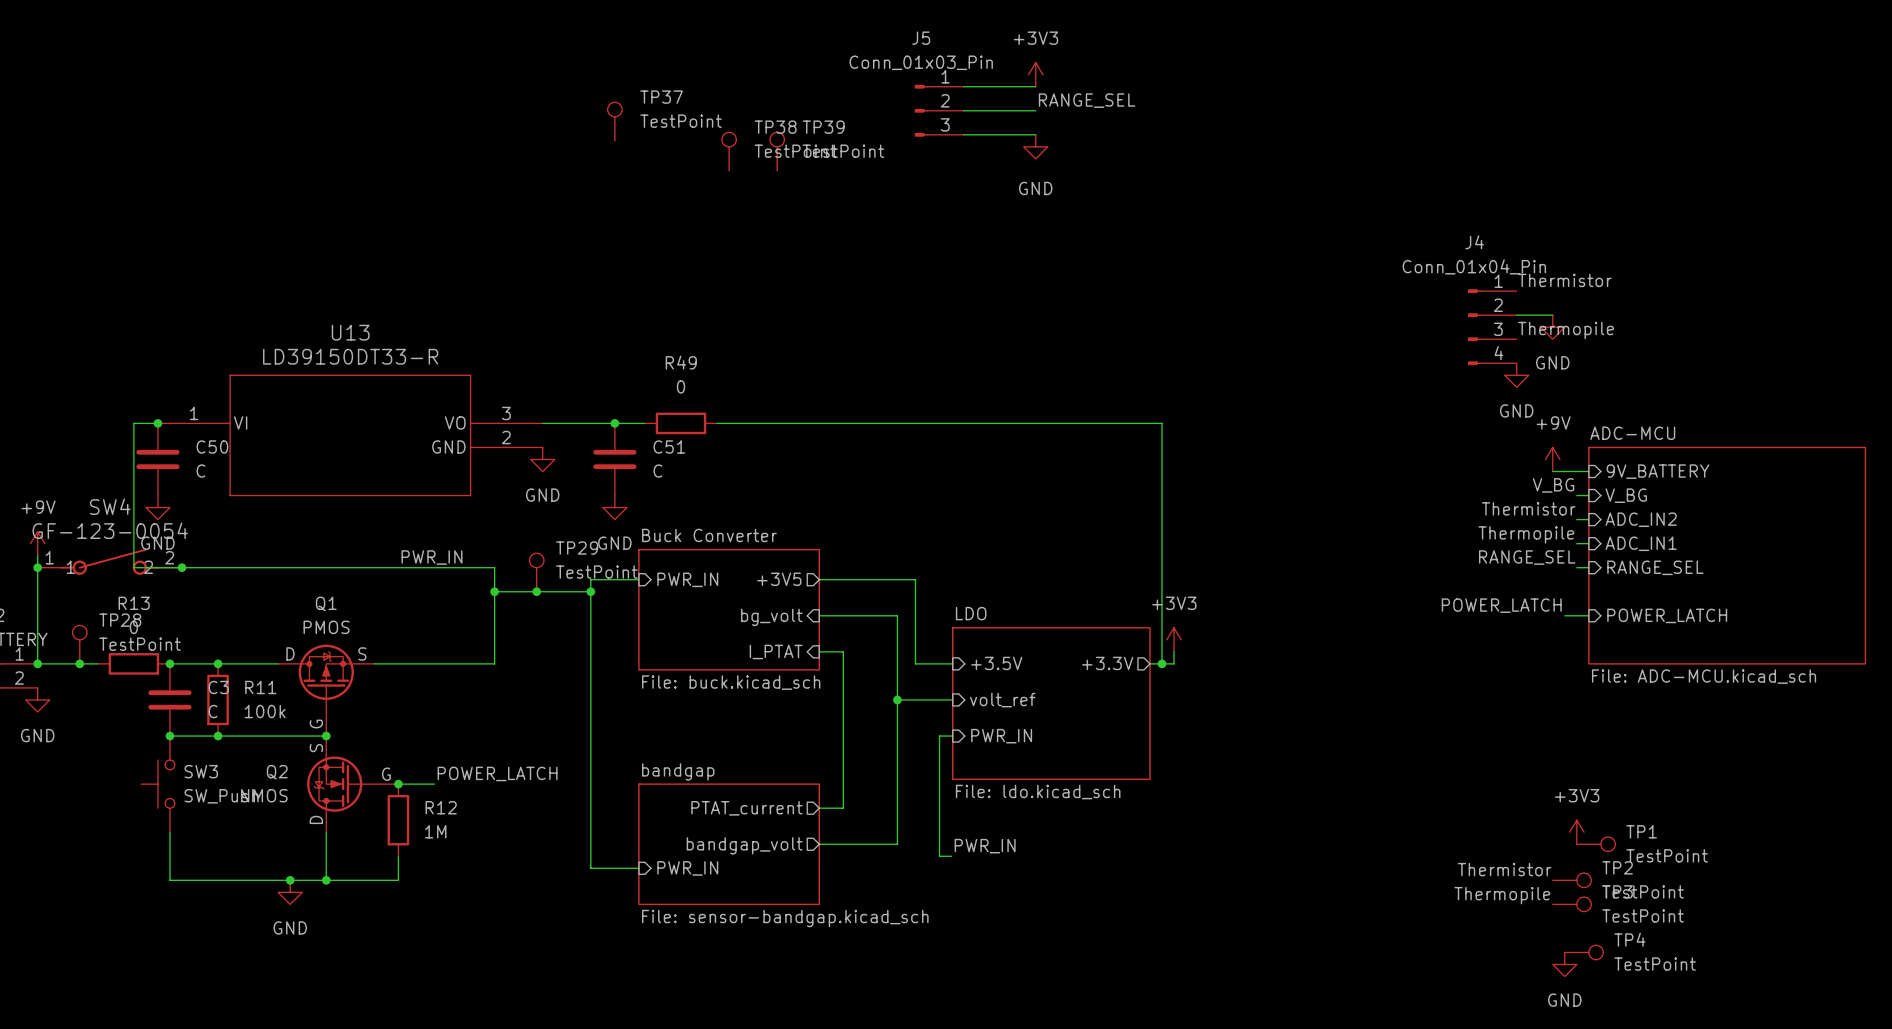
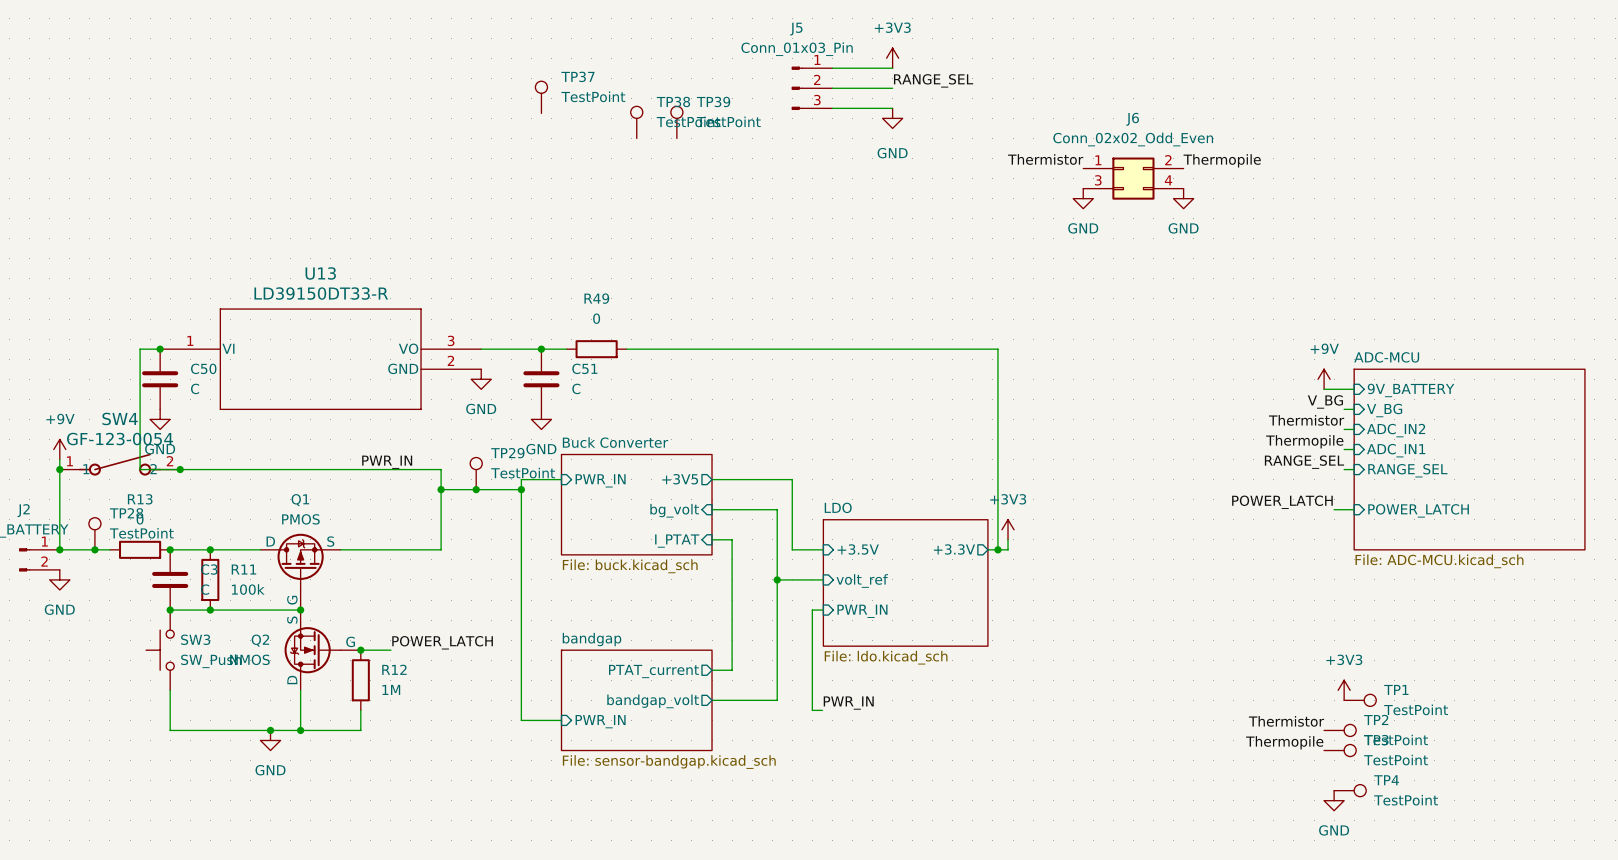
label: none -> Thermistor (1045, 159)
J6: none -> Conn_02x02_Odd_Even (1133, 178)
power symbol: none -> GND (1083, 198)
power symbol: none -> GND (1183, 198)
label: Thermistor (1564, 280) -> none
wire: (1516, 315) (1552, 315) -> none
J4: Conn_01x04_Pin (1492, 327) -> none
power symbol: GND (1552, 327) -> none
label position: Thermopile (1566, 330) -> Thermopile (1222, 160)
power symbol: GND (1516, 375) -> none

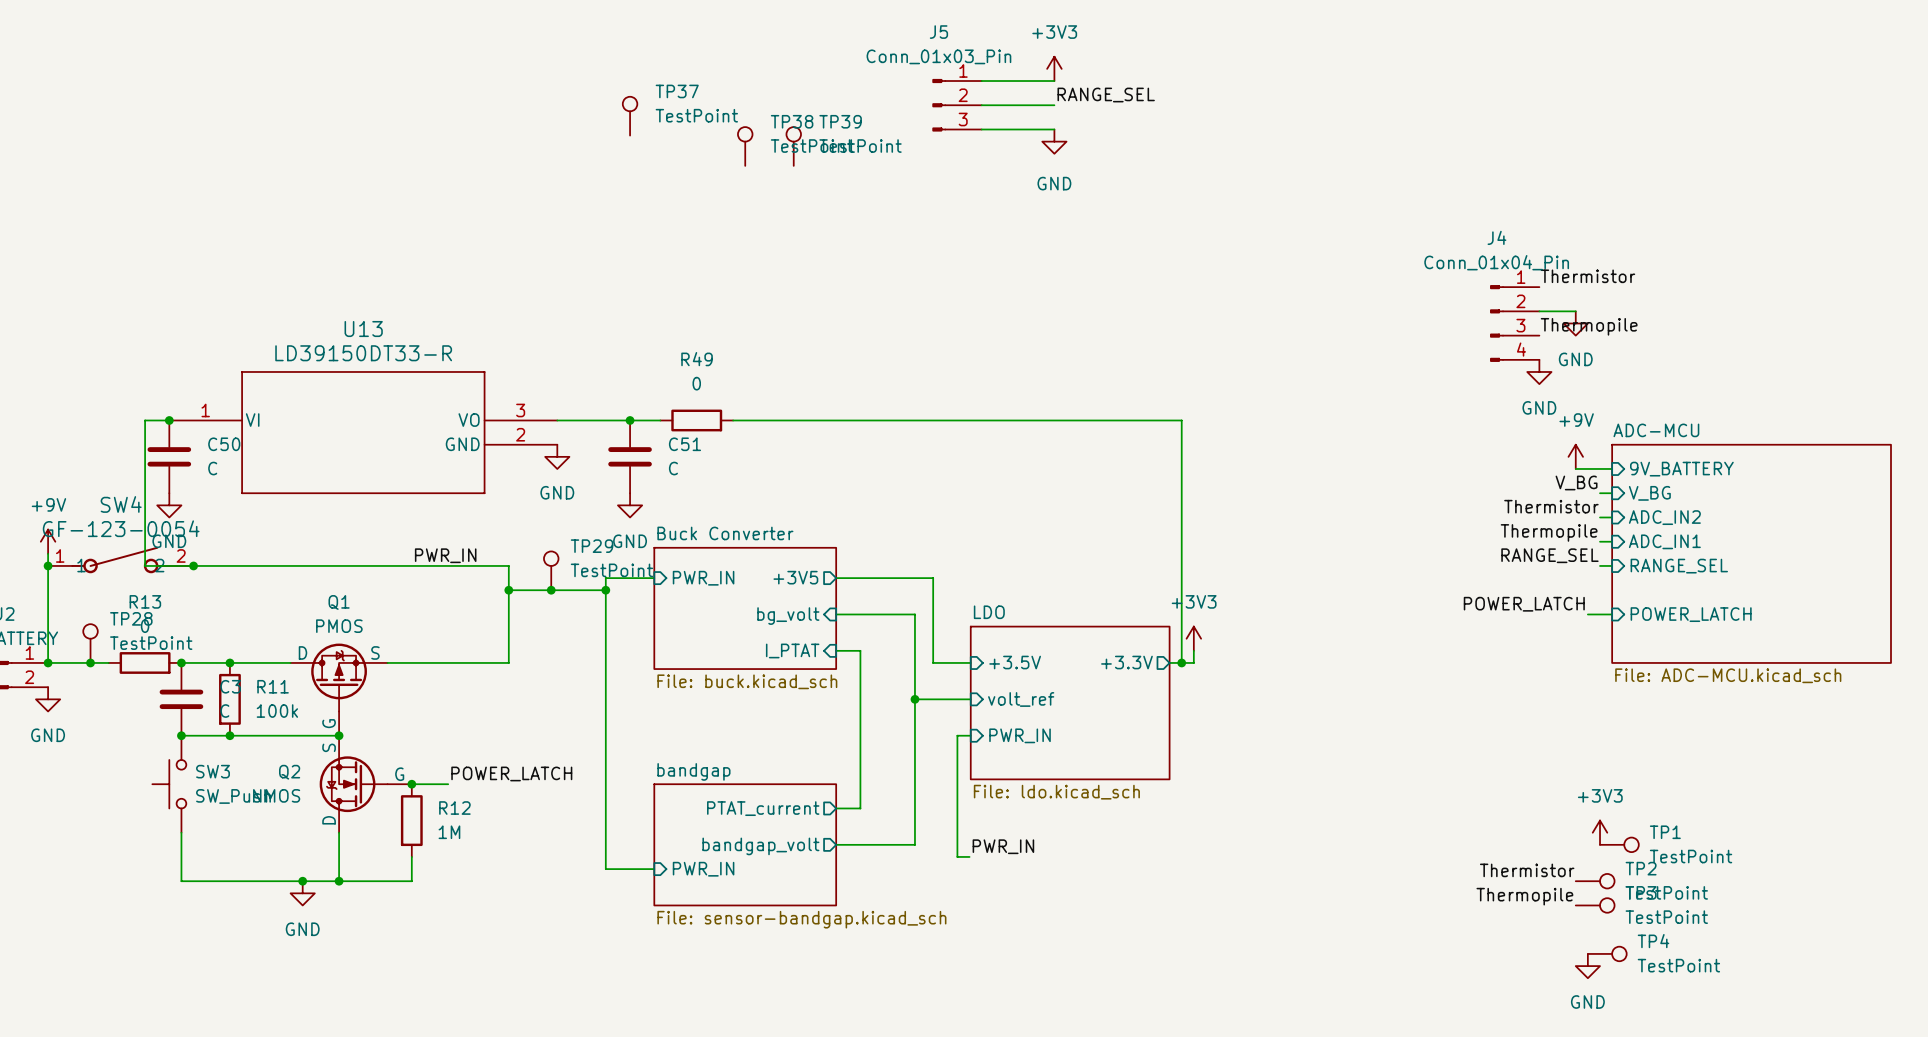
label: Thermistor (1045, 159) -> none
label position: Thermopile (1222, 160) -> Thermopile (1589, 326)
J6: Conn_02x02_Odd_Even (1133, 178) -> none
power symbol: GND (1083, 198) -> none
power symbol: GND (1183, 198) -> none
label: none -> Thermistor (1587, 276)
wire: none -> (1539, 311) (1575, 311)
J4: none -> Conn_01x04_Pin (1514, 323)
power symbol: none -> GND (1575, 323)
power symbol: none -> GND (1539, 371)

